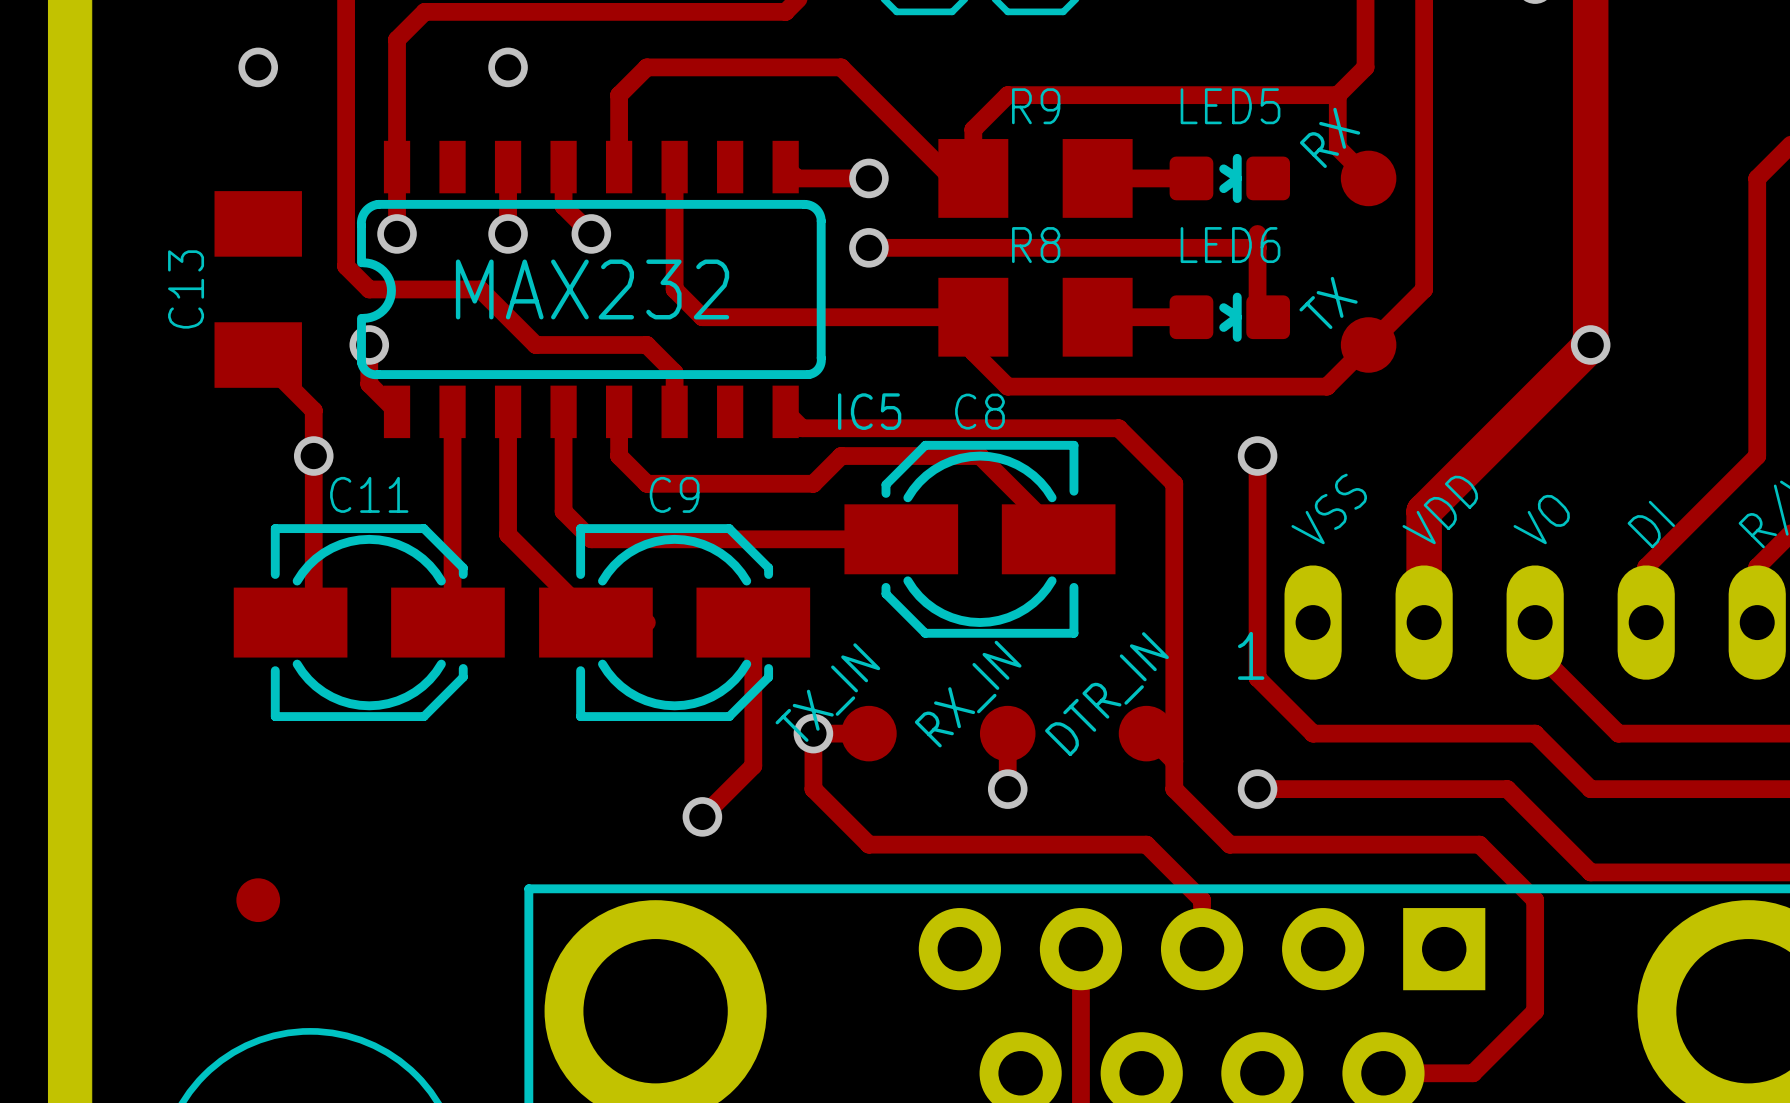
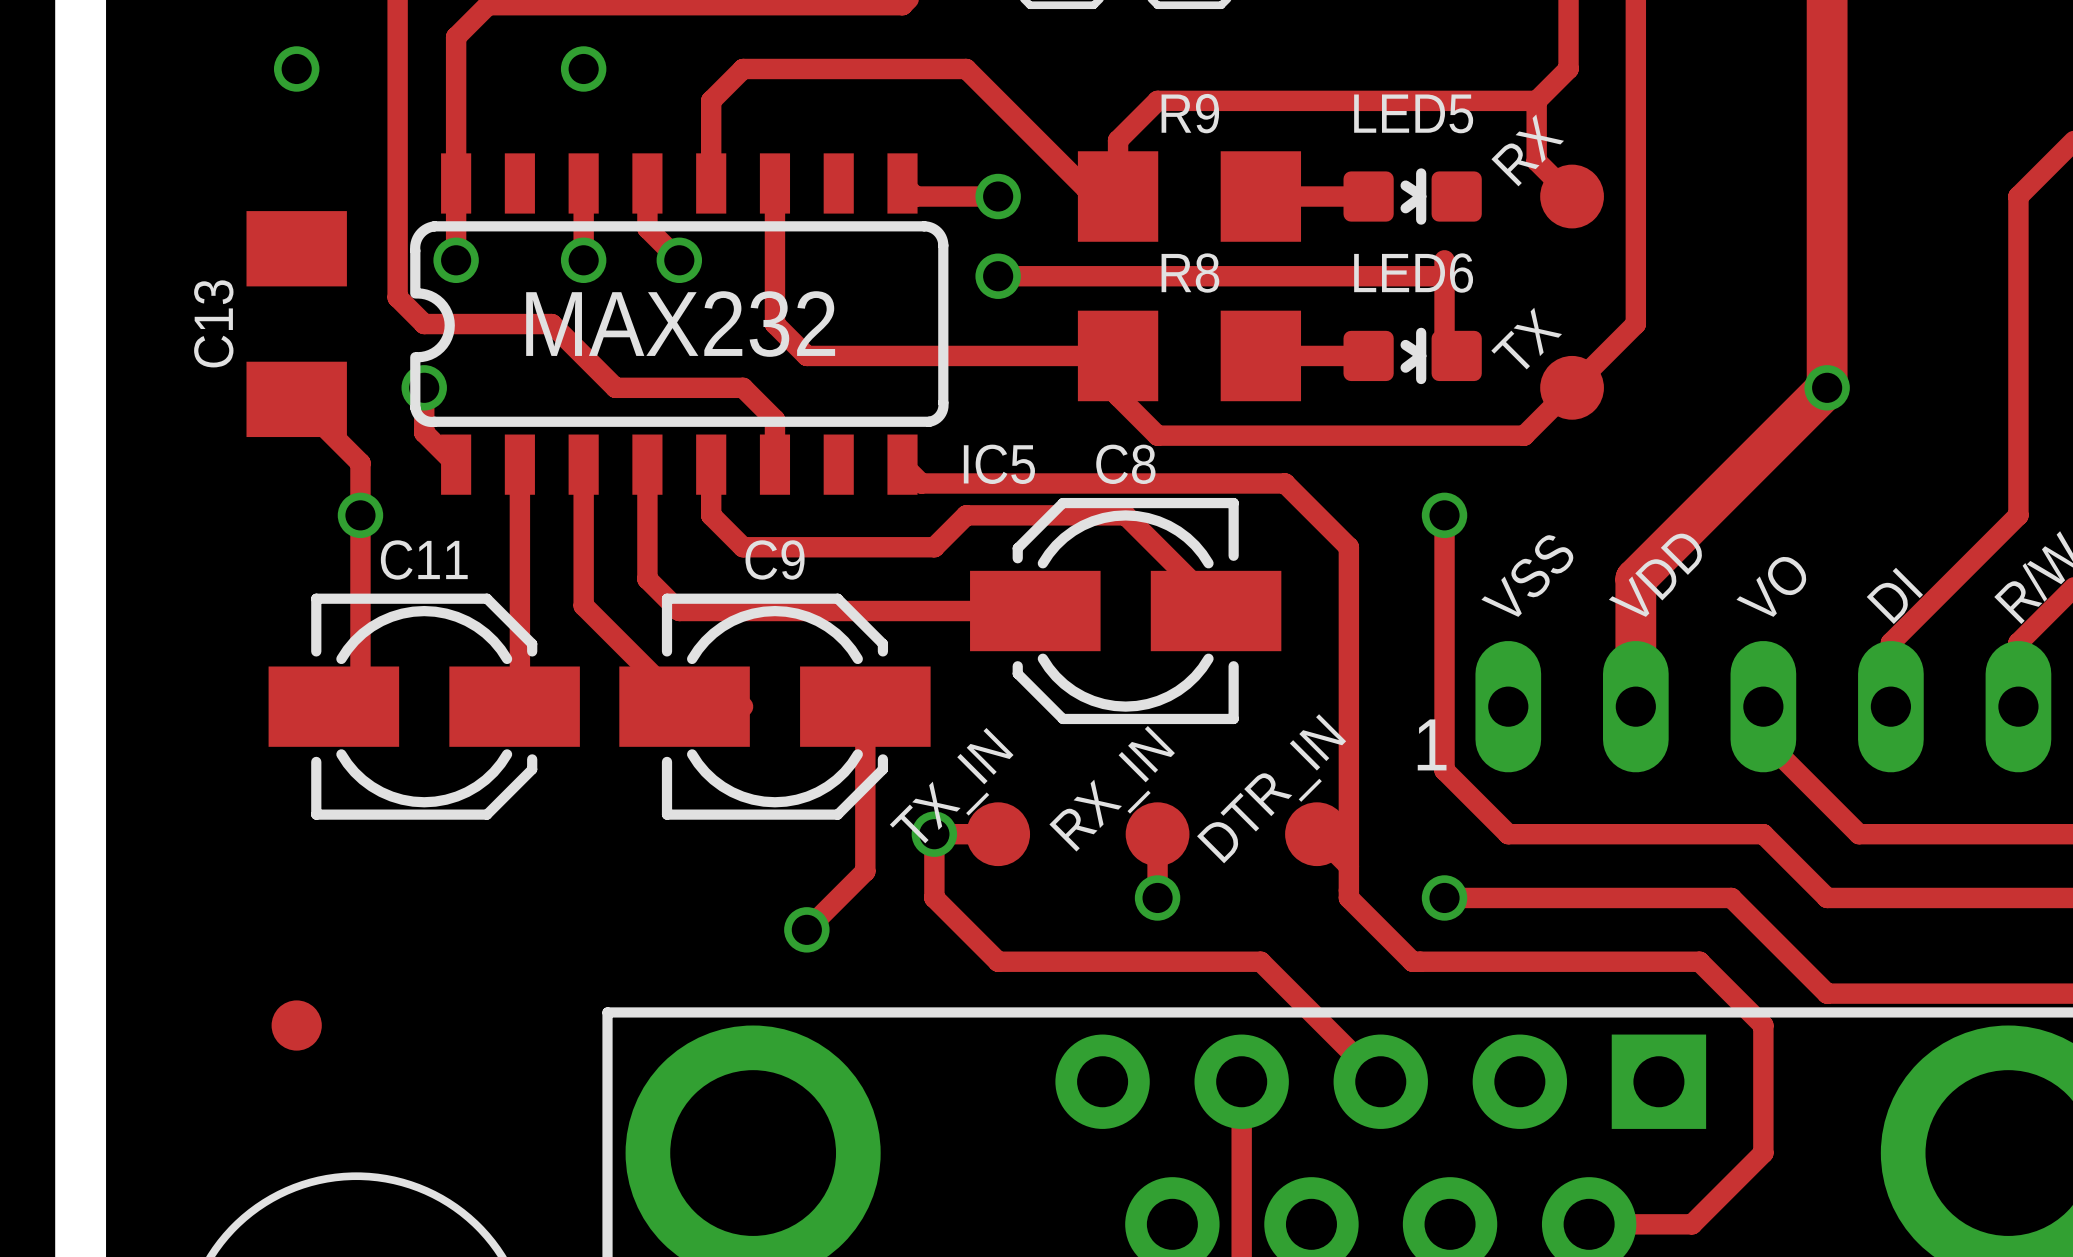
track: (1097, 844) (1146, 844) (1202, 900) (1202, 949) -> (1260, 961) (1380, 1081)

